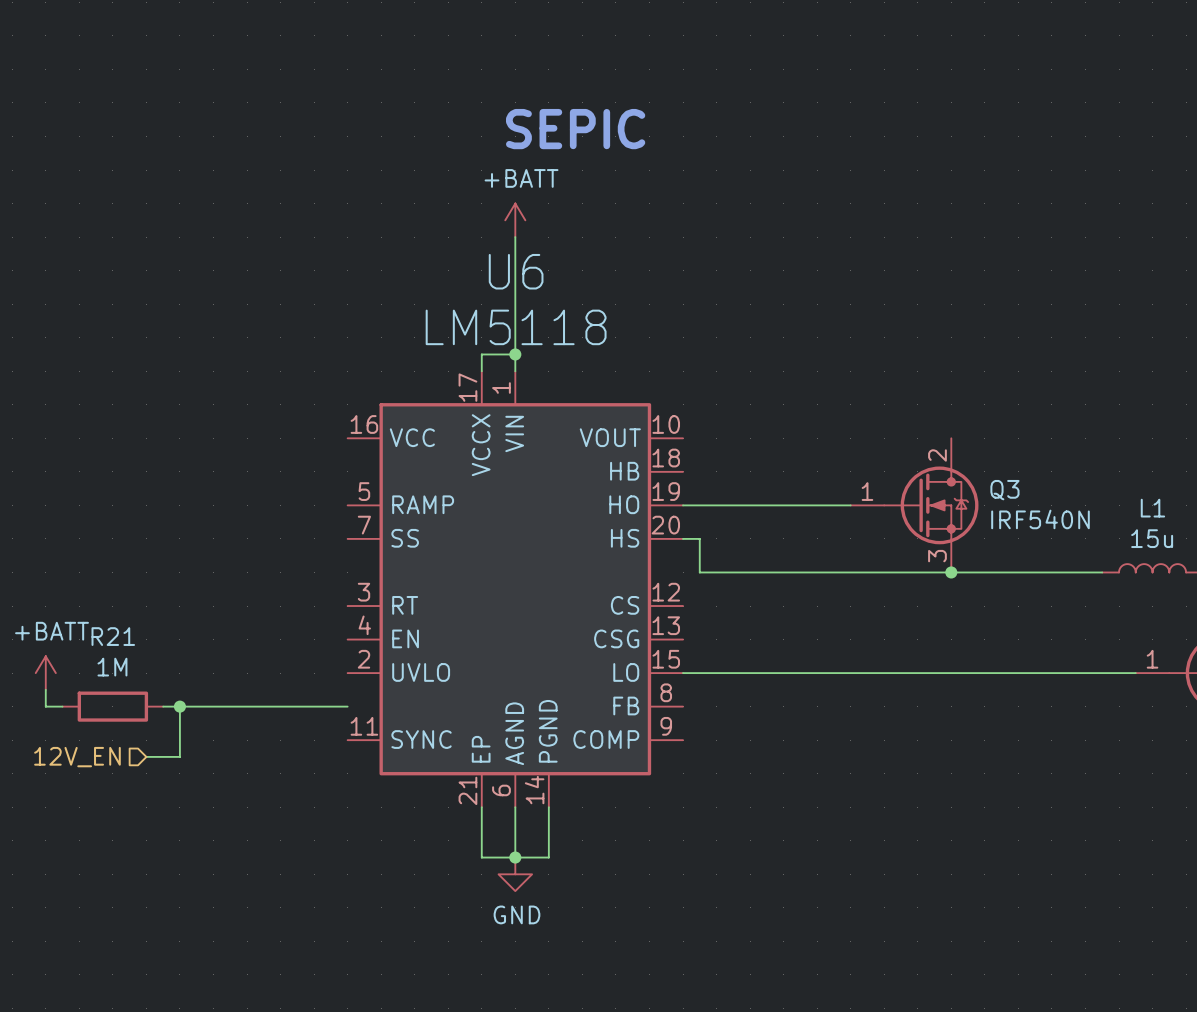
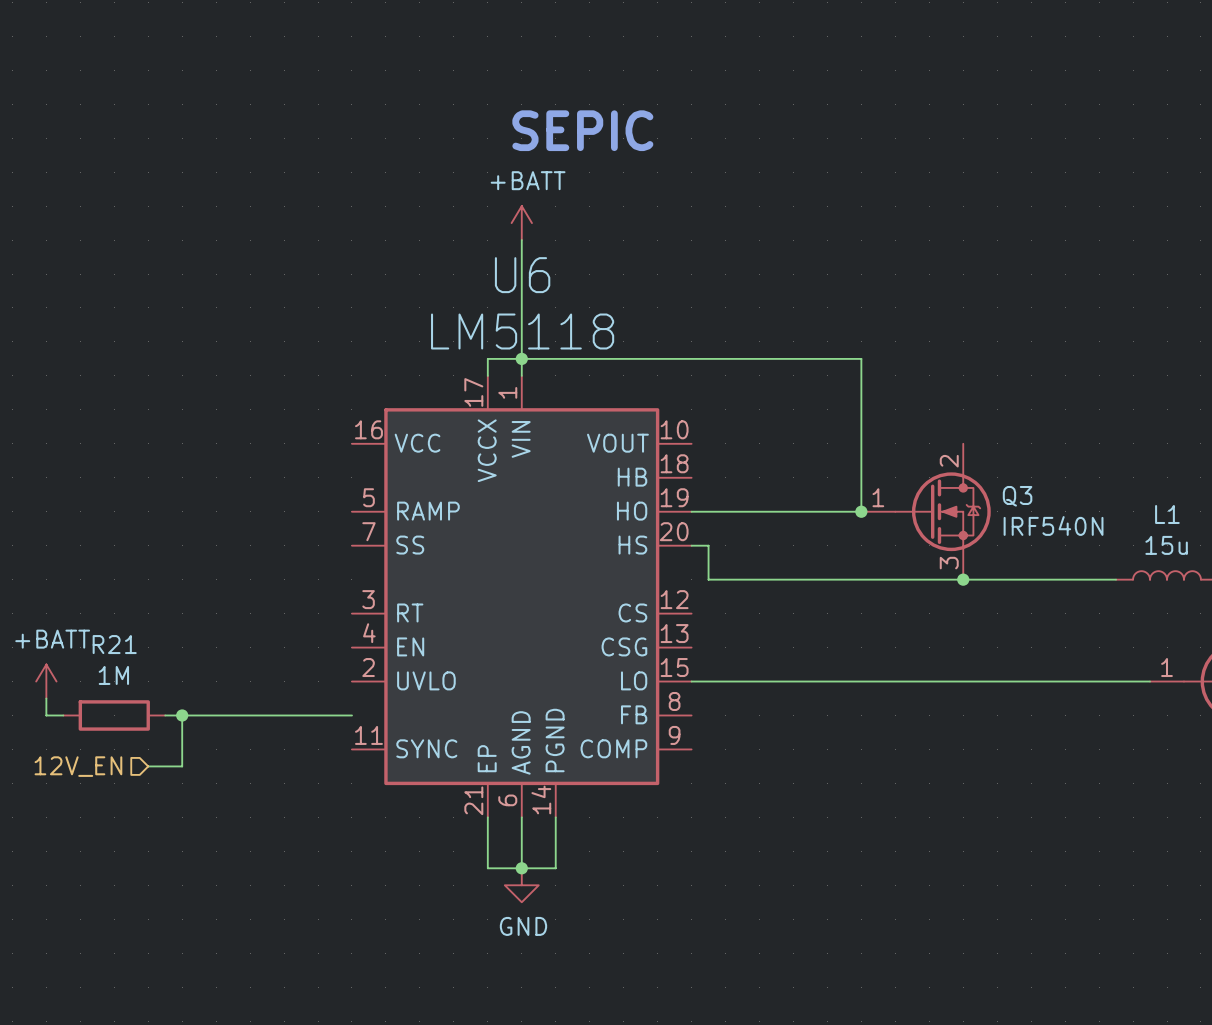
wire: none -> (521, 358) (861, 358) (861, 511)
junction: none -> (861, 511)

